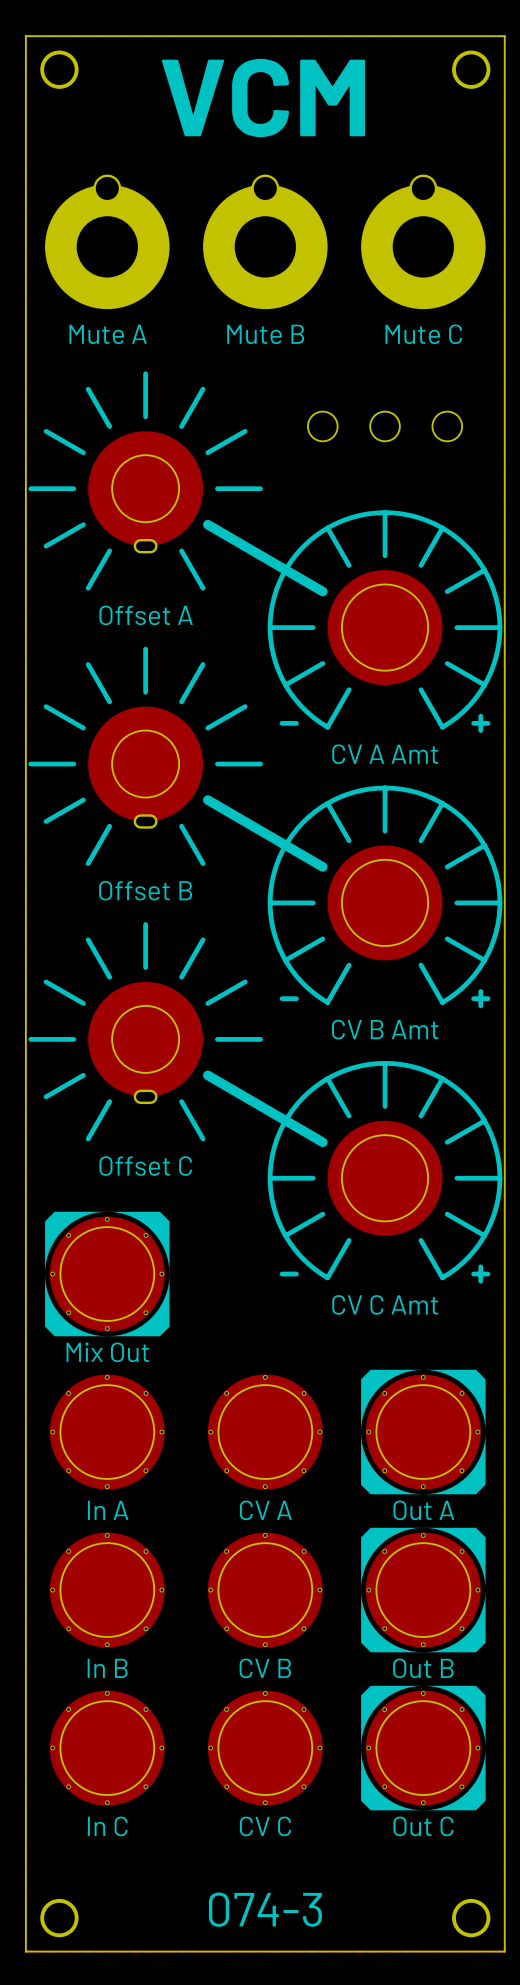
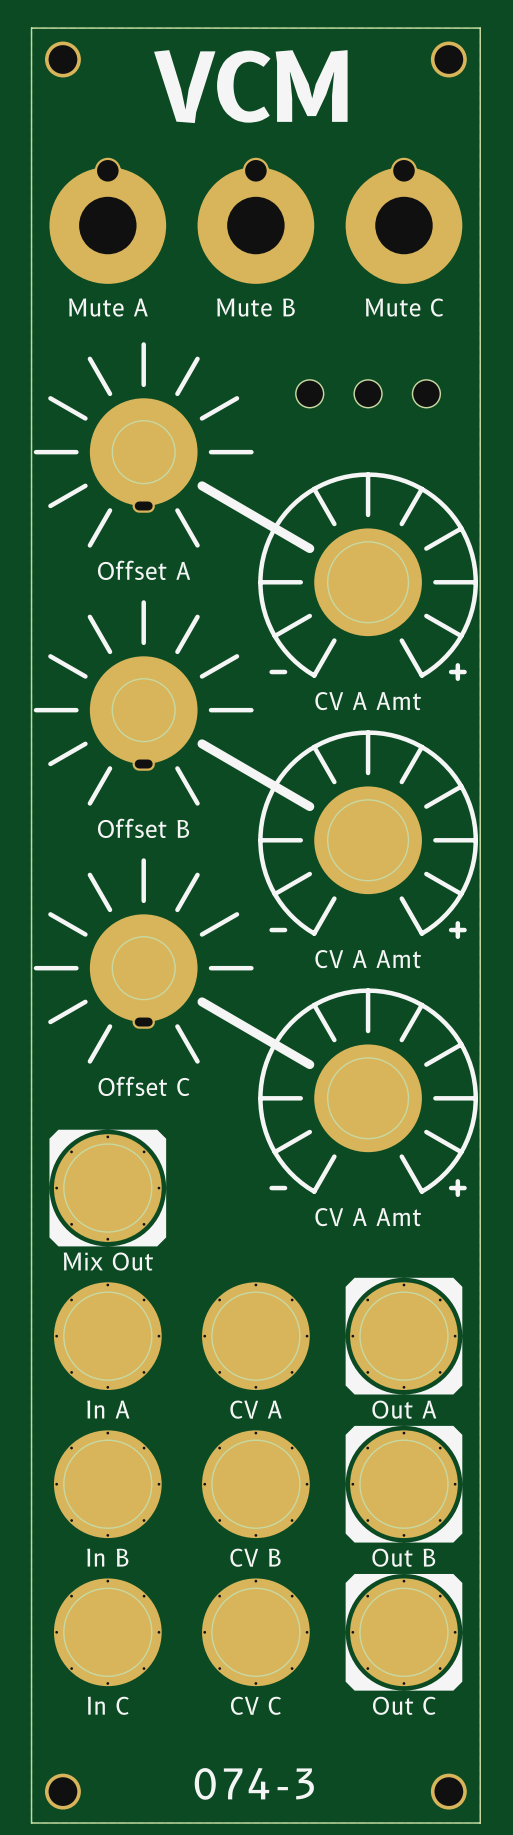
part value: CV B Amt (385, 1029) -> CV A Amt (368, 959)
part value: CV C Amt (385, 1304) -> CV A Amt (368, 1217)

